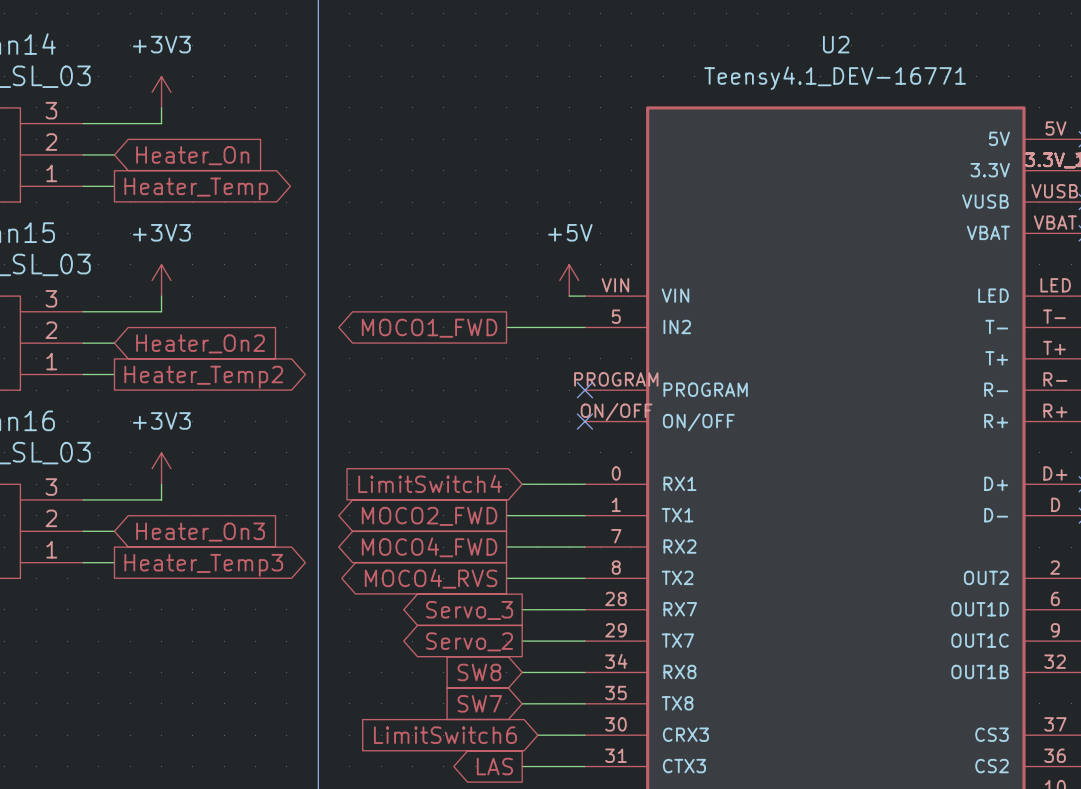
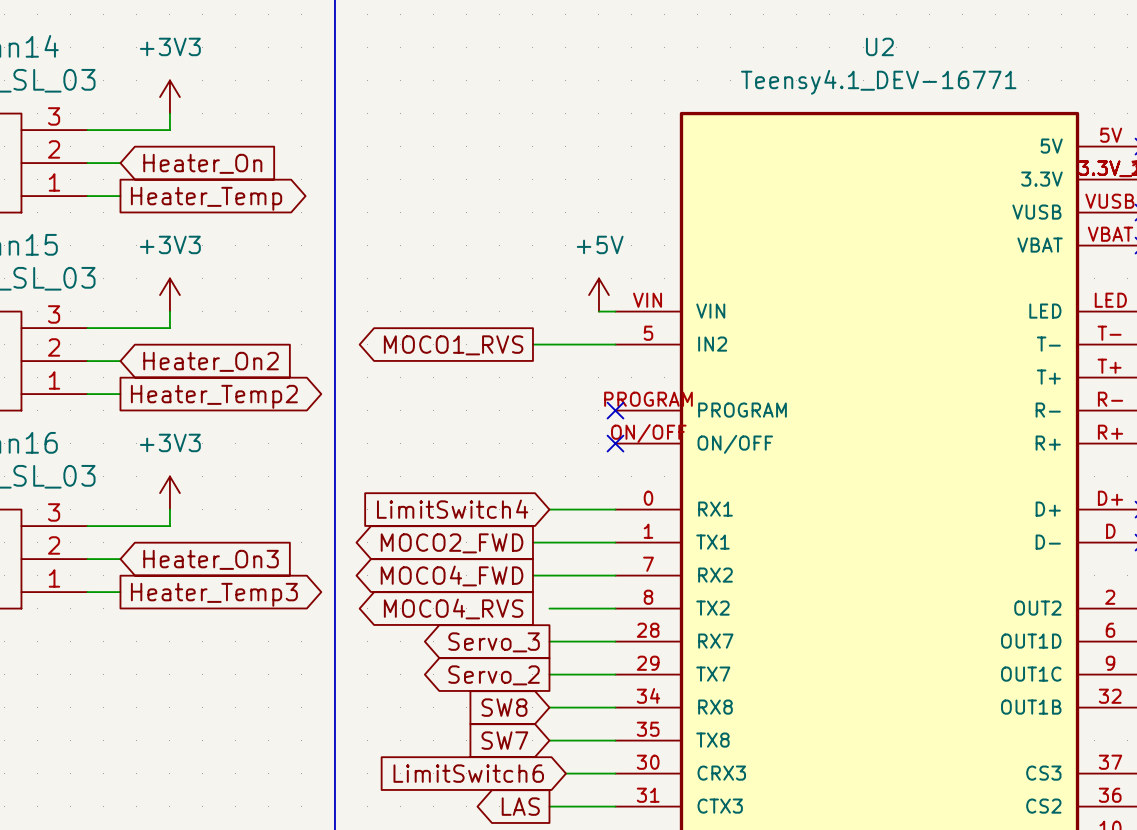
global label: MOCO1_FWD (429, 328) -> MOCO1_RVS (453, 345)
wire: (506, 578) (522, 578) -> none

